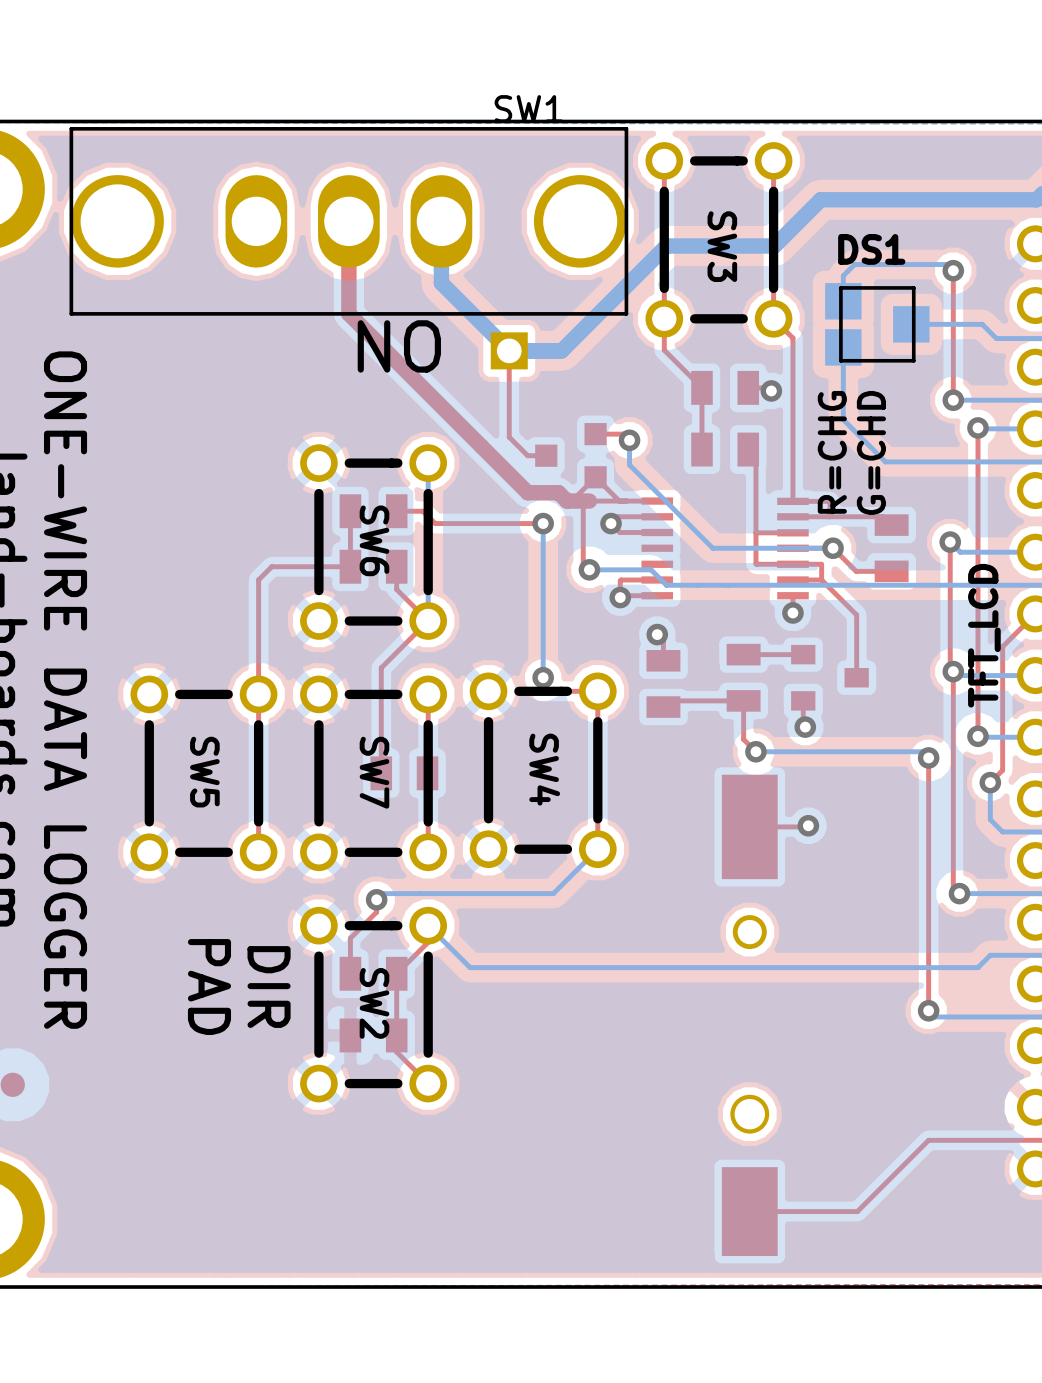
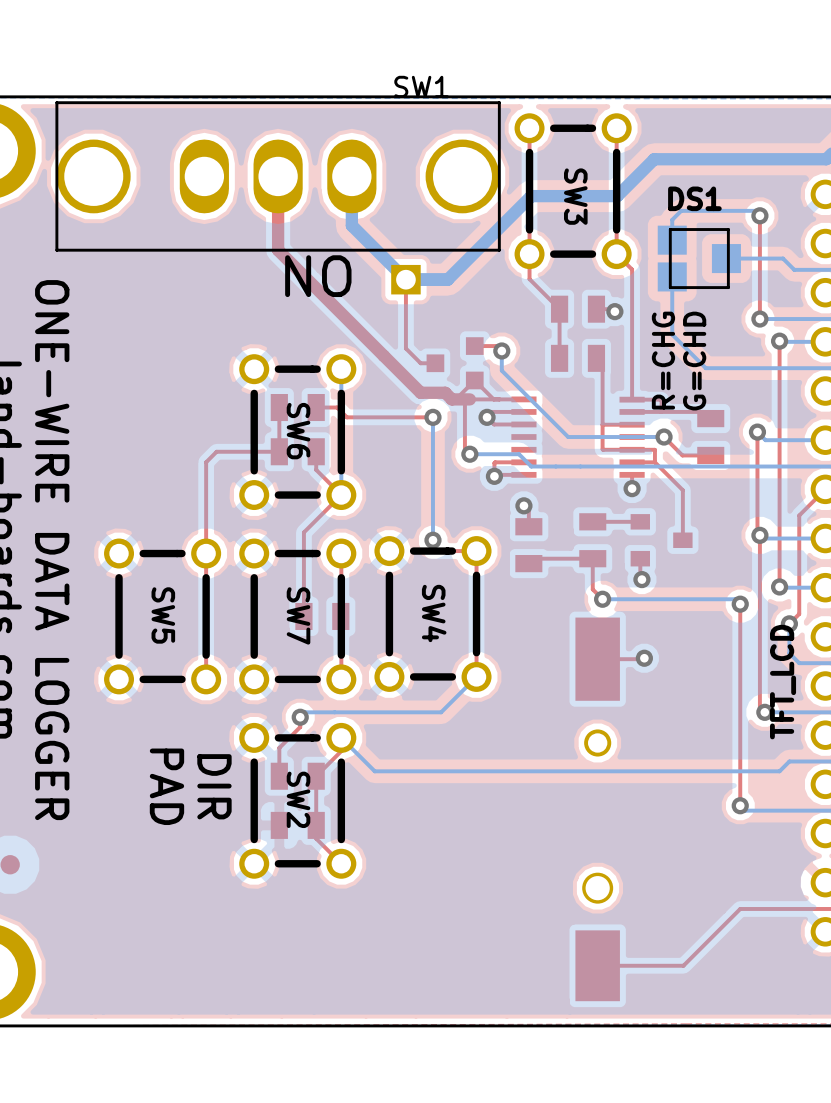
text position: TFT_LCD (984, 635) -> TFT_LCD (783, 682)

